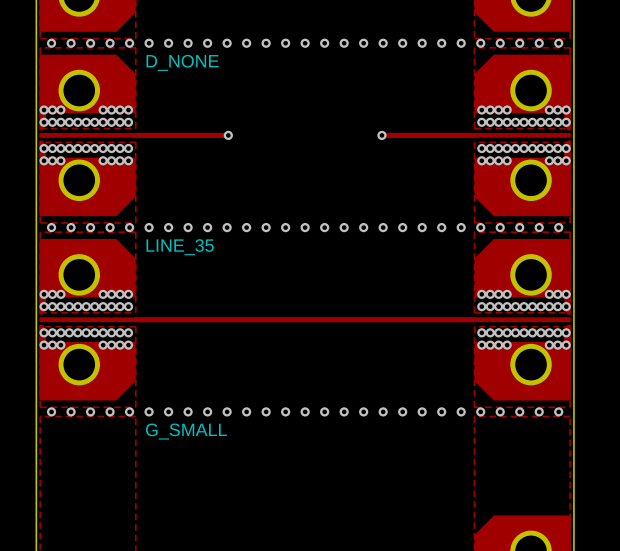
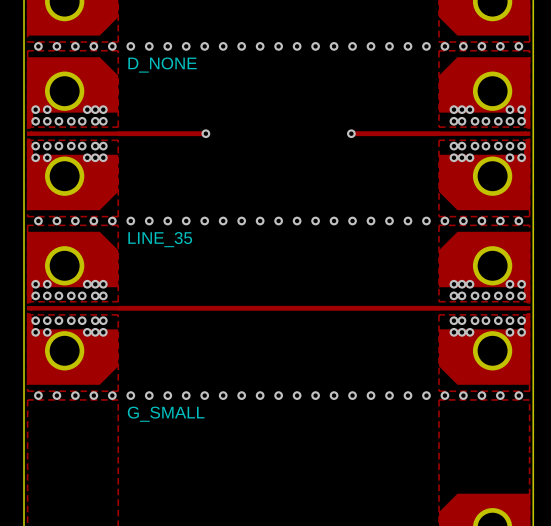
via: (44, 110) -> none
via: none -> (35, 109)
via: (52, 110) -> none
via: (128, 110) -> none
via: (481, 110) -> none
via: (557, 110) -> none
via: none -> (521, 109)
via: (566, 110) -> none
via: (44, 122) -> none
via: none -> (35, 121)
via: (52, 122) -> none
via: (69, 122) -> none
via: none -> (58, 121)
via: (77, 122) -> none
via: (94, 122) -> none
via: none -> (82, 121)
via: (103, 122) -> none
via: (128, 122) -> none
via: (481, 122) -> none
via: (507, 122) -> none
via: none -> (475, 121)
via: (515, 122) -> none
via: (532, 122) -> none
via: none -> (498, 121)
via: (540, 122) -> none
via: (557, 122) -> none
via: none -> (521, 121)
via: (566, 122) -> none
via: (44, 148) -> none
via: none -> (35, 146)
via: (52, 148) -> none
via: (69, 148) -> none
via: none -> (58, 146)
via: (77, 148) -> none
via: (94, 148) -> none
via: none -> (82, 146)
via: (103, 148) -> none
via: (128, 148) -> none
via: (481, 148) -> none
via: (507, 148) -> none
via: none -> (475, 146)
via: (515, 148) -> none
via: (532, 148) -> none
via: none -> (498, 146)
via: (540, 148) -> none
via: (557, 148) -> none
via: none -> (521, 146)
via: (566, 148) -> none
via: (44, 160) -> none
via: none -> (35, 157)
via: (52, 160) -> none
via: (128, 160) -> none
via: (481, 160) -> none
via: (557, 160) -> none
via: none -> (521, 157)
via: (566, 160) -> none
via: (44, 294) -> none
via: none -> (35, 284)
via: (52, 294) -> none
via: (128, 294) -> none
via: (481, 294) -> none
via: (557, 294) -> none
via: none -> (521, 284)
via: (566, 294) -> none
via: (44, 306) -> none
via: none -> (35, 295)
via: (52, 306) -> none
via: (69, 306) -> none
via: none -> (58, 295)
via: (77, 306) -> none
via: (94, 306) -> none
via: none -> (82, 295)
via: (103, 306) -> none
via: (128, 306) -> none
via: (481, 306) -> none
via: (507, 306) -> none
via: none -> (475, 295)
via: (515, 306) -> none
via: (532, 306) -> none
via: none -> (498, 295)
via: (540, 306) -> none
via: (557, 306) -> none
via: none -> (521, 295)
via: (566, 306) -> none
via: (44, 332) -> none
via: none -> (35, 320)
via: (52, 332) -> none
via: (69, 332) -> none
via: none -> (58, 320)
via: (77, 332) -> none
via: (94, 332) -> none
via: none -> (82, 320)
via: (103, 332) -> none
via: (128, 332) -> none
via: (481, 332) -> none
via: (507, 332) -> none
via: none -> (475, 320)
via: (515, 332) -> none
via: (532, 332) -> none
via: none -> (498, 320)
via: (540, 332) -> none
via: (557, 332) -> none
via: none -> (521, 320)
via: (566, 332) -> none
via: (44, 345) -> none
via: none -> (35, 332)
via: (52, 345) -> none
via: (128, 345) -> none
via: (481, 345) -> none
via: (557, 345) -> none
via: none -> (521, 332)
via: (566, 345) -> none

